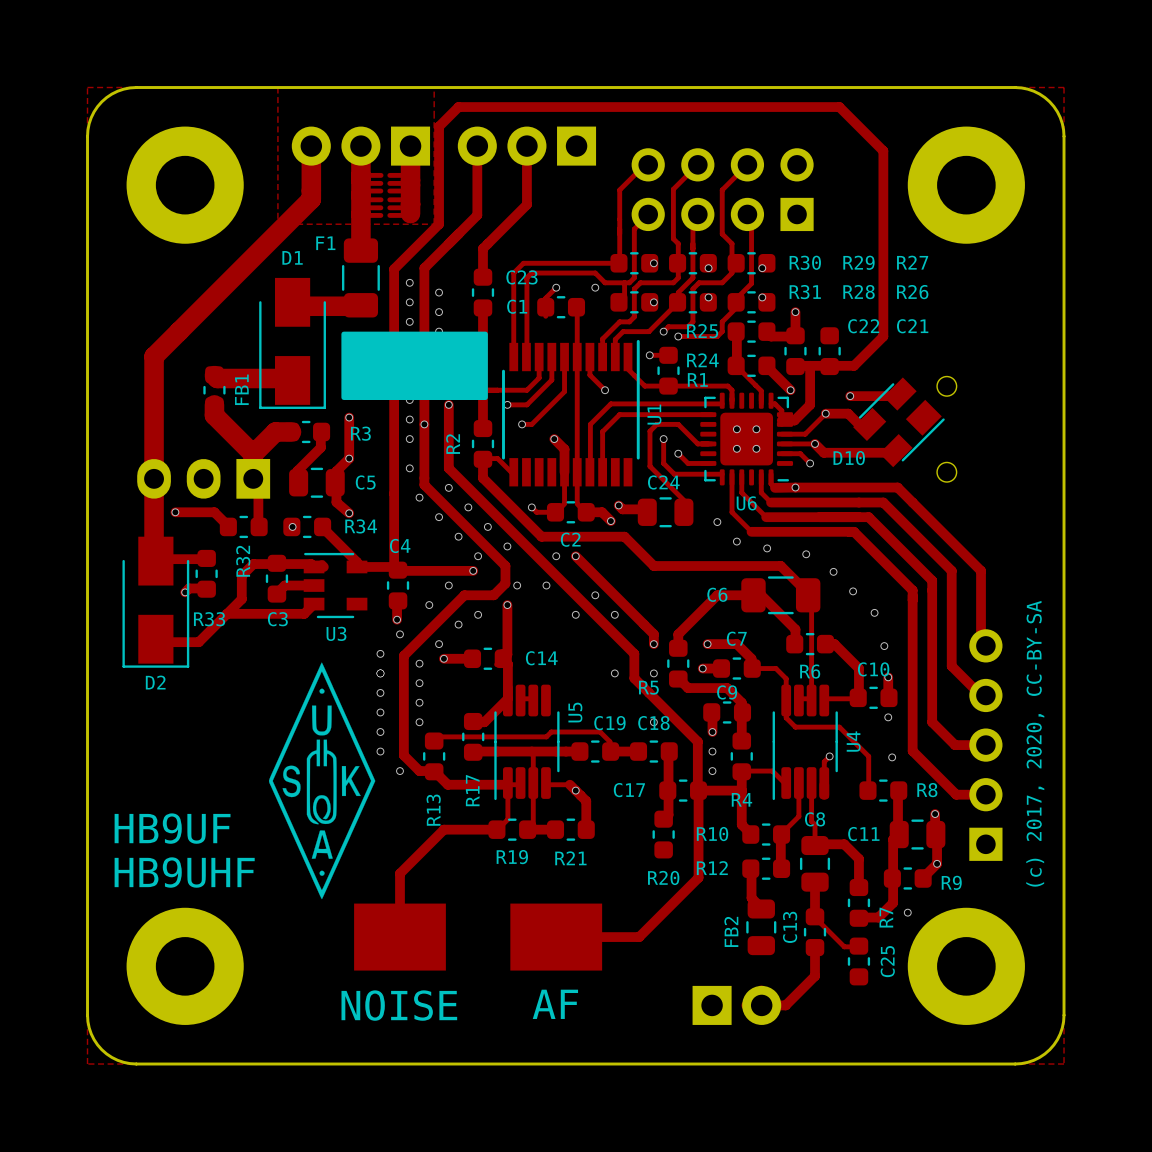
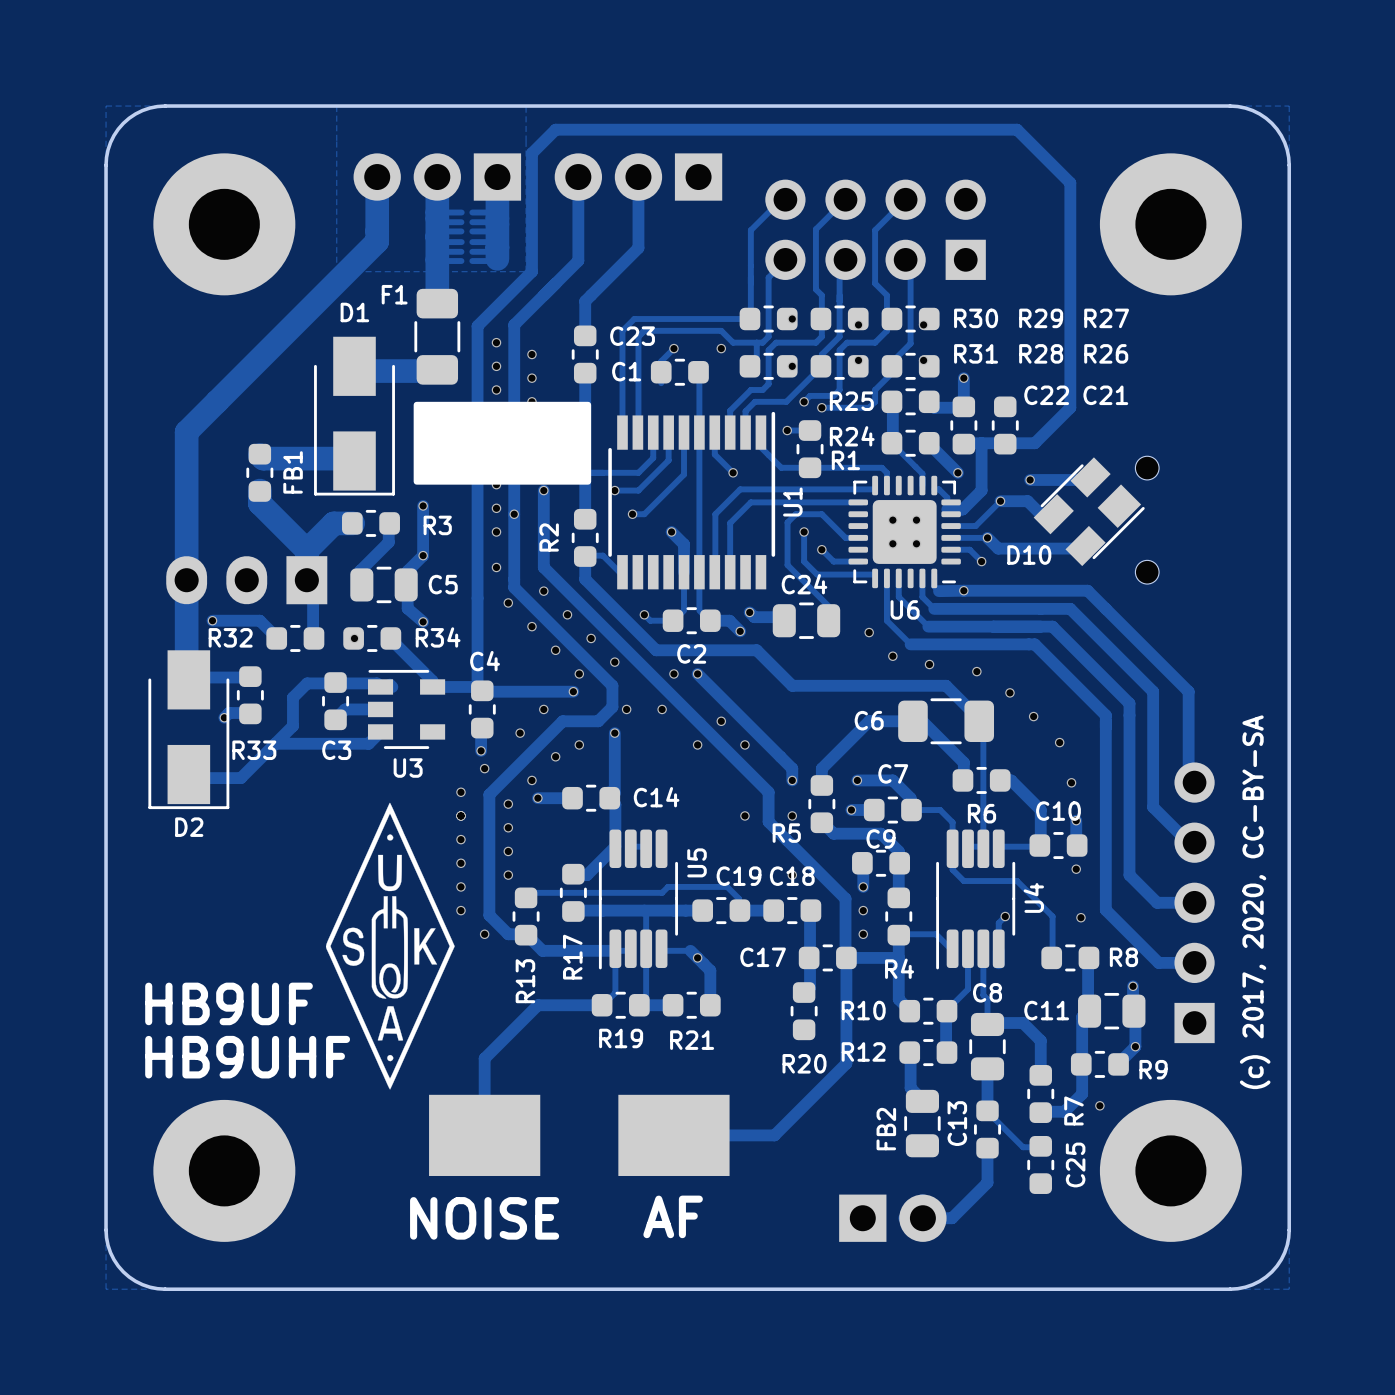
R32 name rotation: 0° (243, 561) -> 90° clockwise (230, 637)
R32 name position: R32 (243, 561) -> R32 (230, 637)

